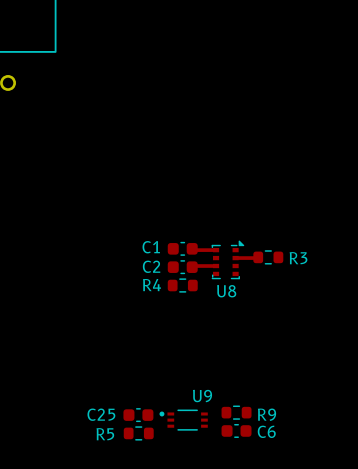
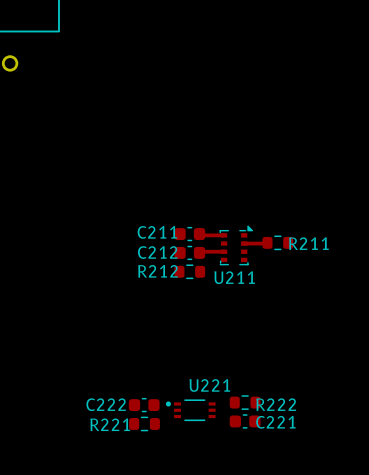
C1 name: C1 (151, 247) -> C211 (157, 232)
R3 name: R3 (298, 258) -> R211 (308, 243)
C2 name: C2 (151, 266) -> C212 (157, 252)
R4 name: R4 (151, 285) -> R212 (157, 271)
U8 name: U8 (226, 291) -> U211 (234, 277)
U9 name: U9 (202, 396) -> U221 (209, 385)
C25 name: C25 (101, 414) -> C222 (106, 404)
R9 name: R9 (267, 414) -> R222 (276, 404)
C6 name: C6 (266, 431) -> C221 (275, 422)
R5 name: R5 (105, 434) -> R221 (110, 424)

